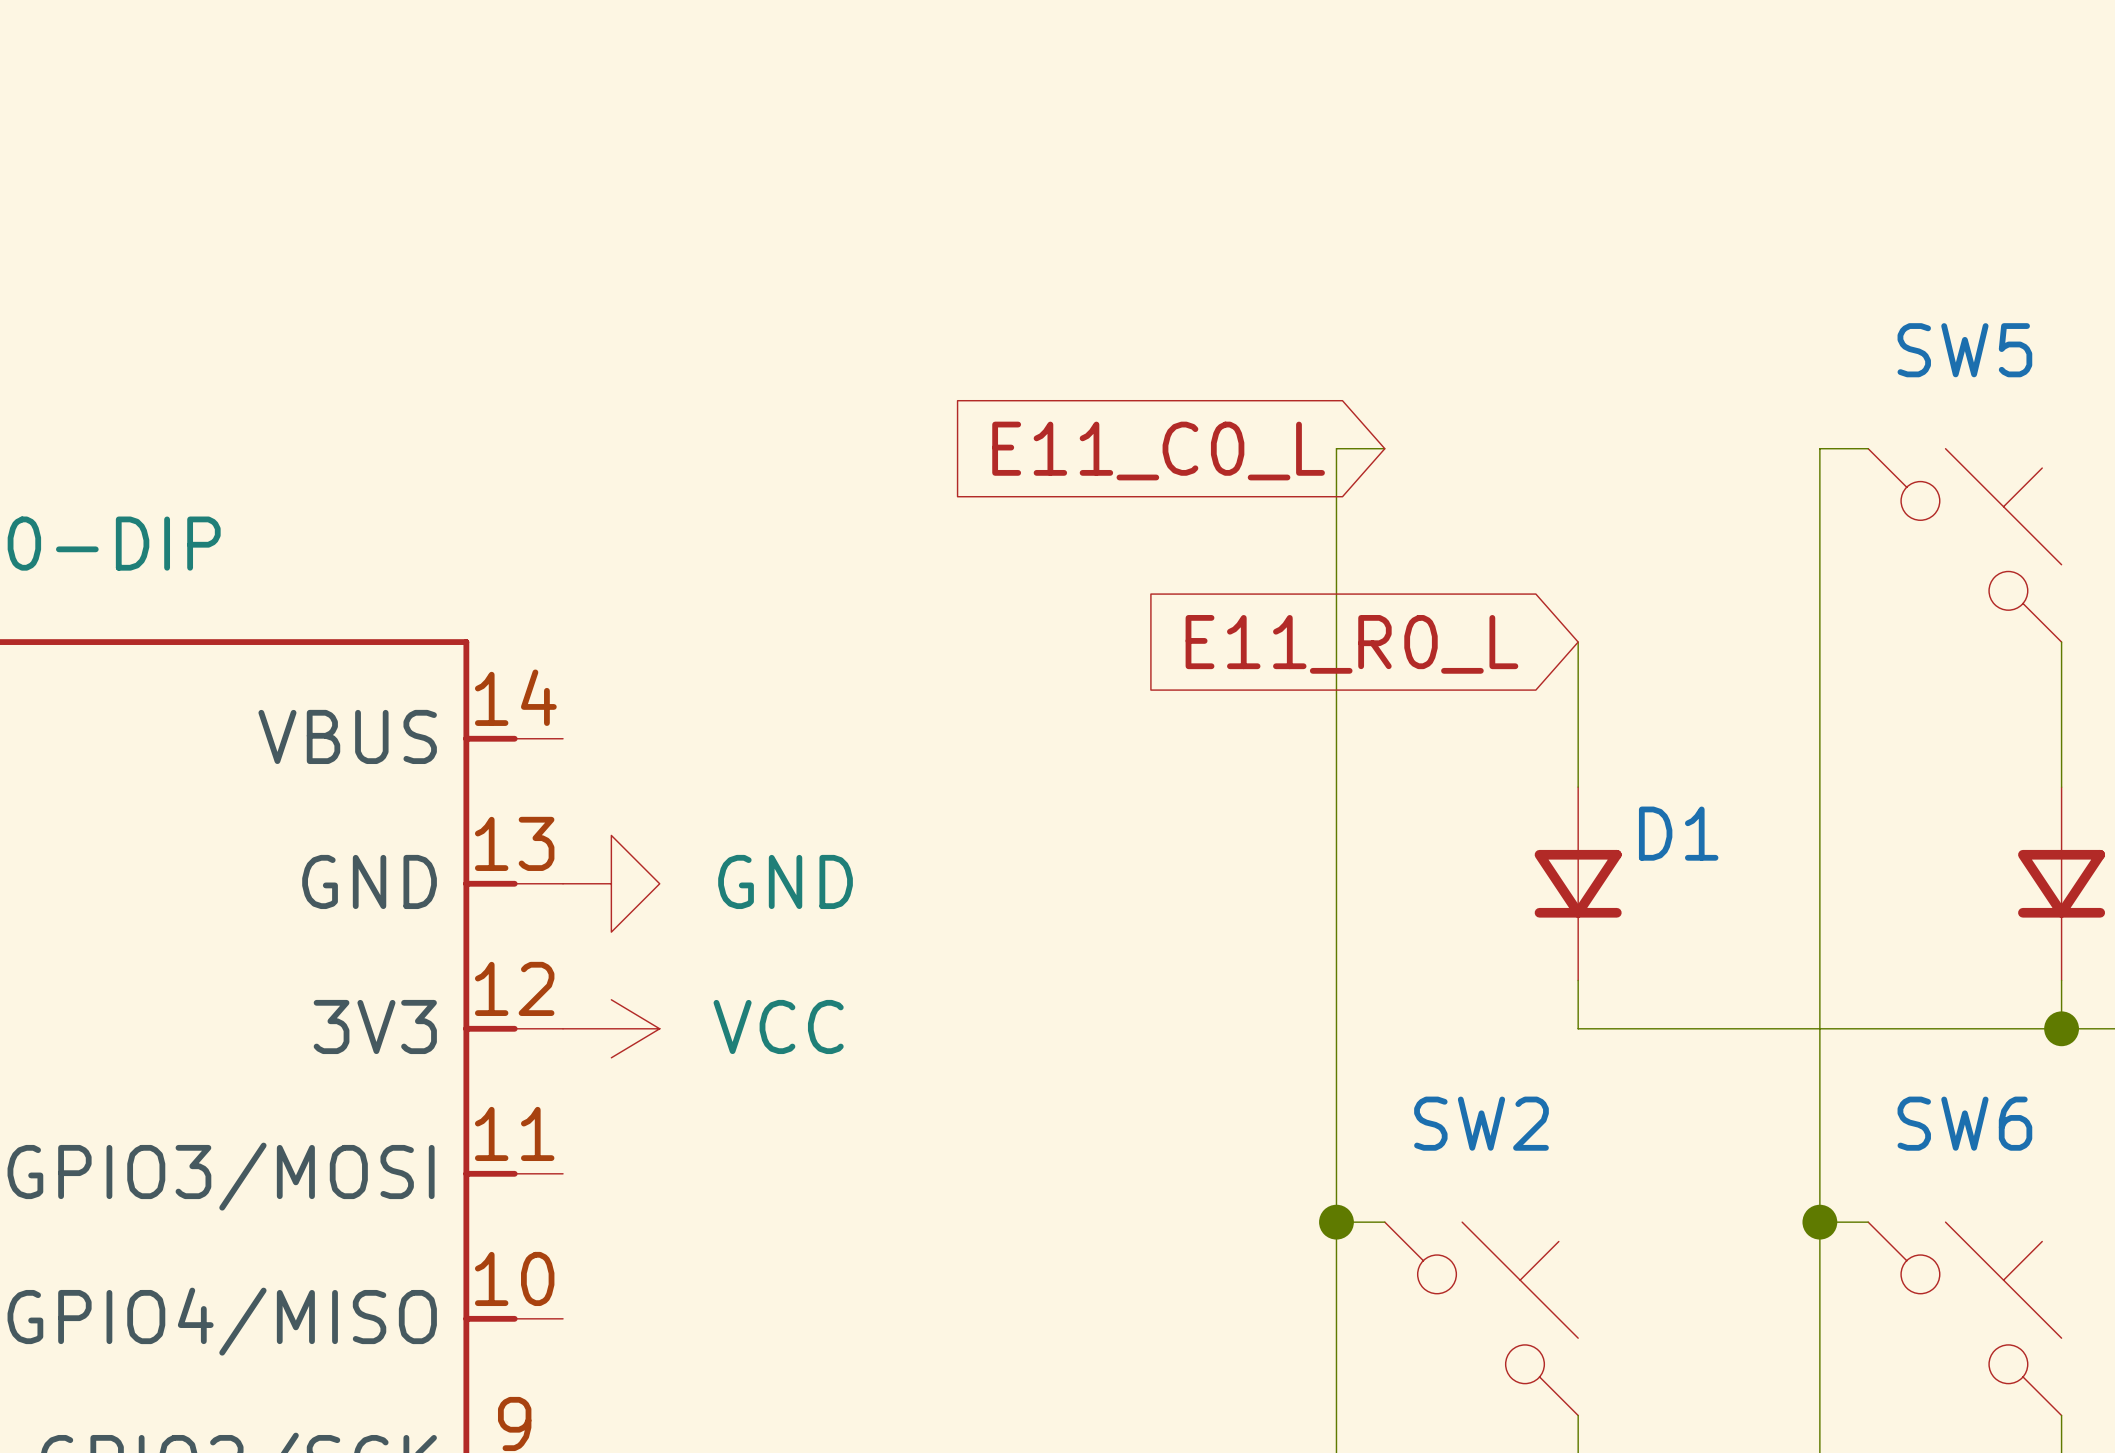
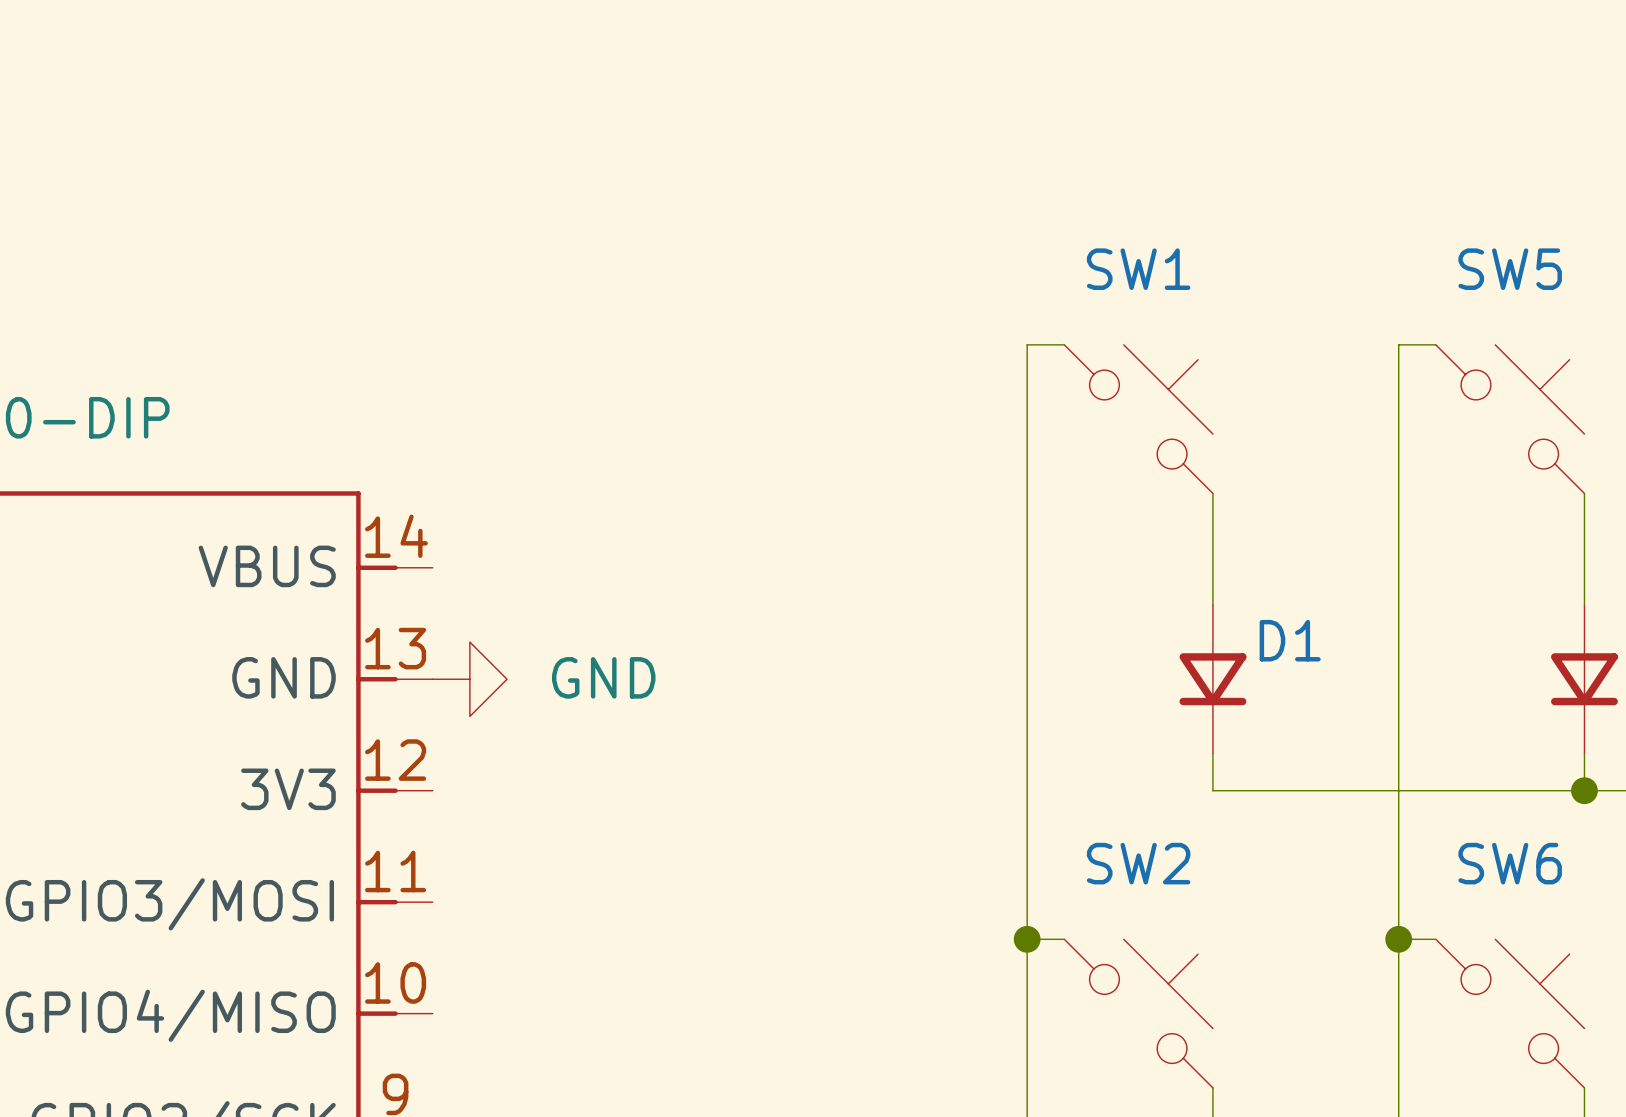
global label: E11_C0_L (1158, 451) -> none
SW1: none -> (1138, 419)
global label: E11_R0_L (1351, 644) -> none
power symbol: VCC (611, 1028) -> none

